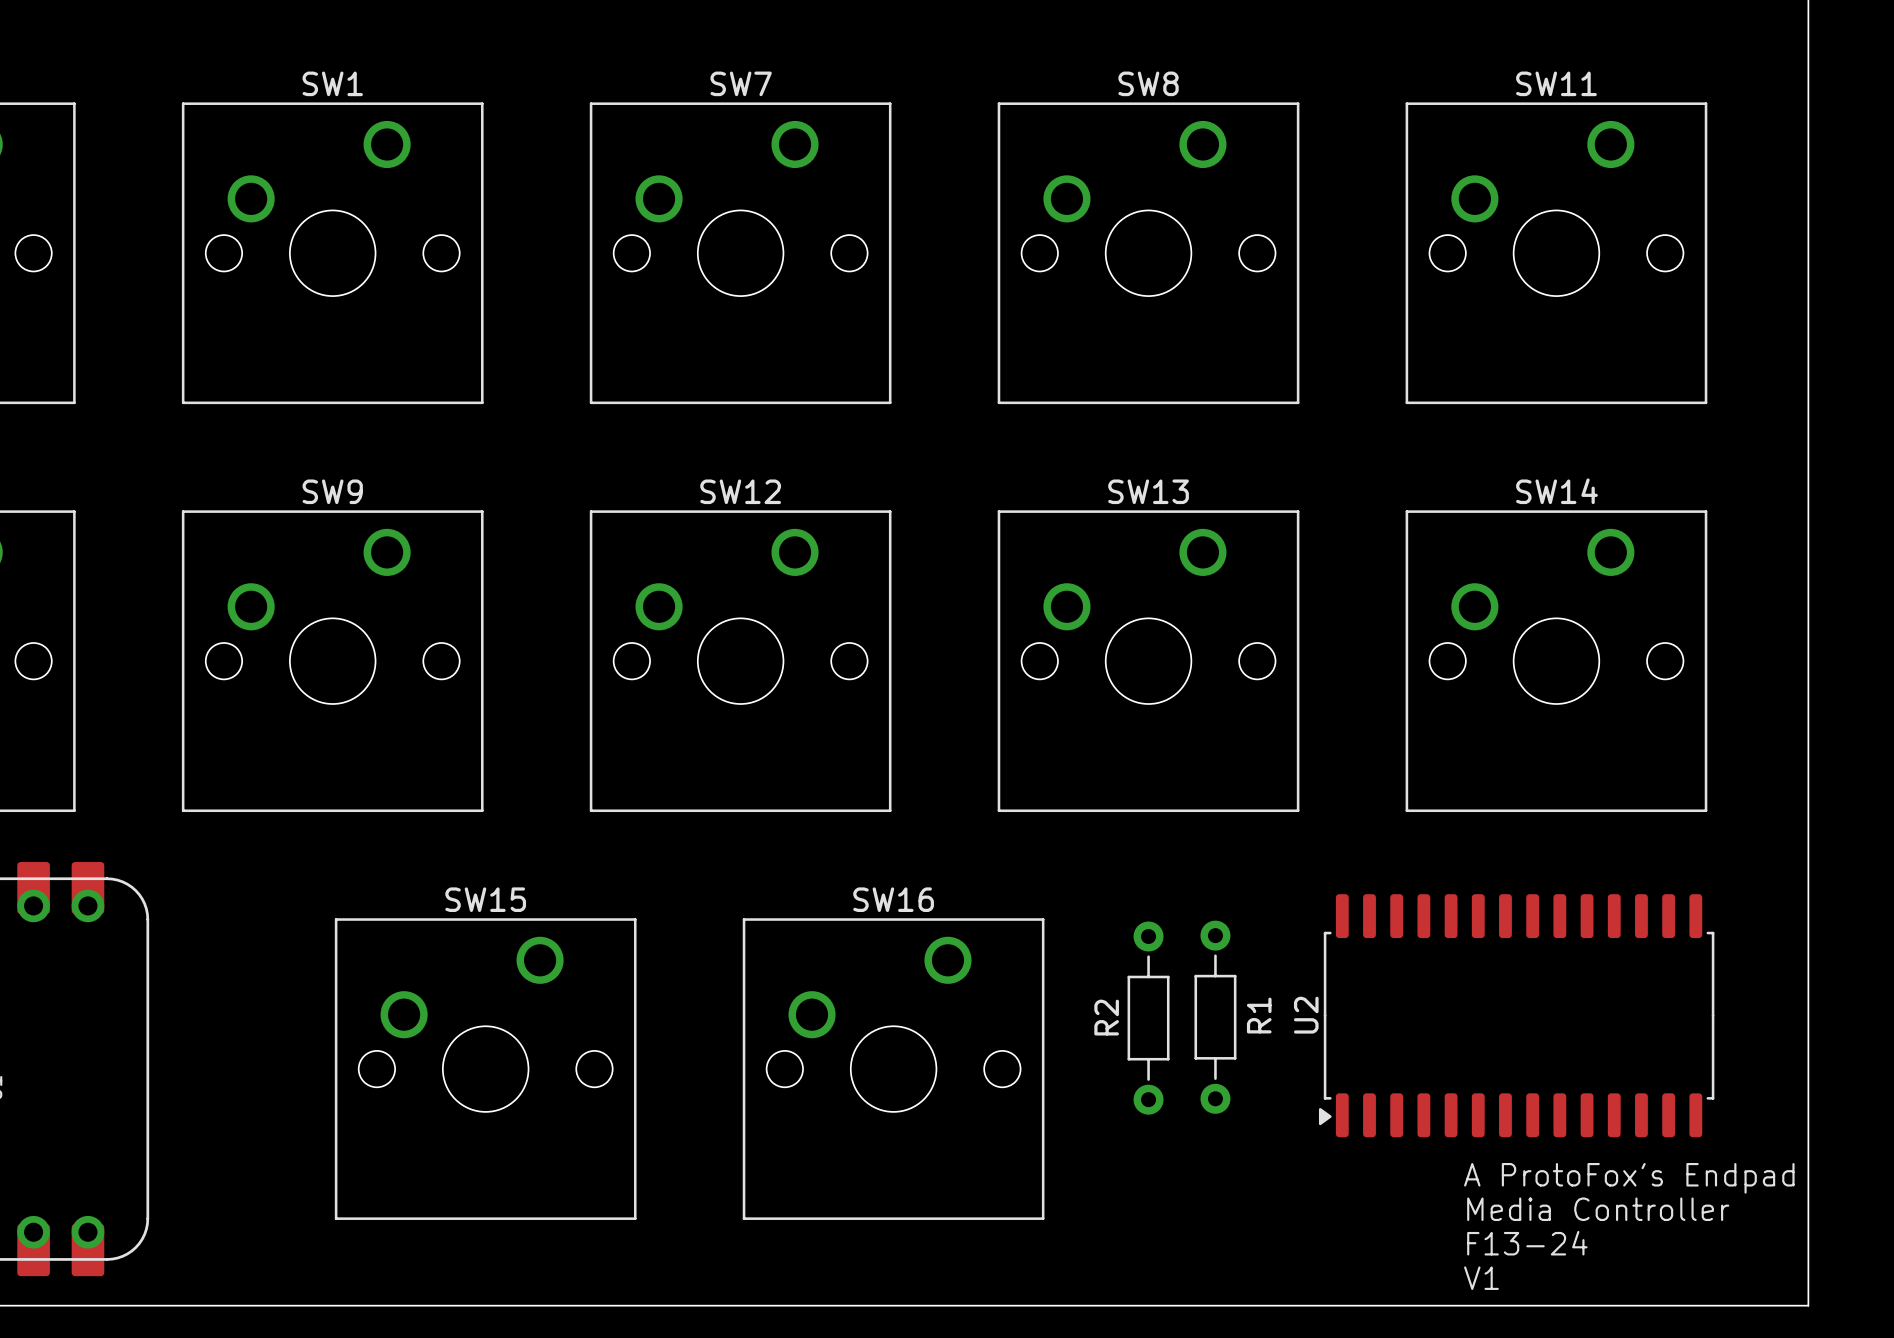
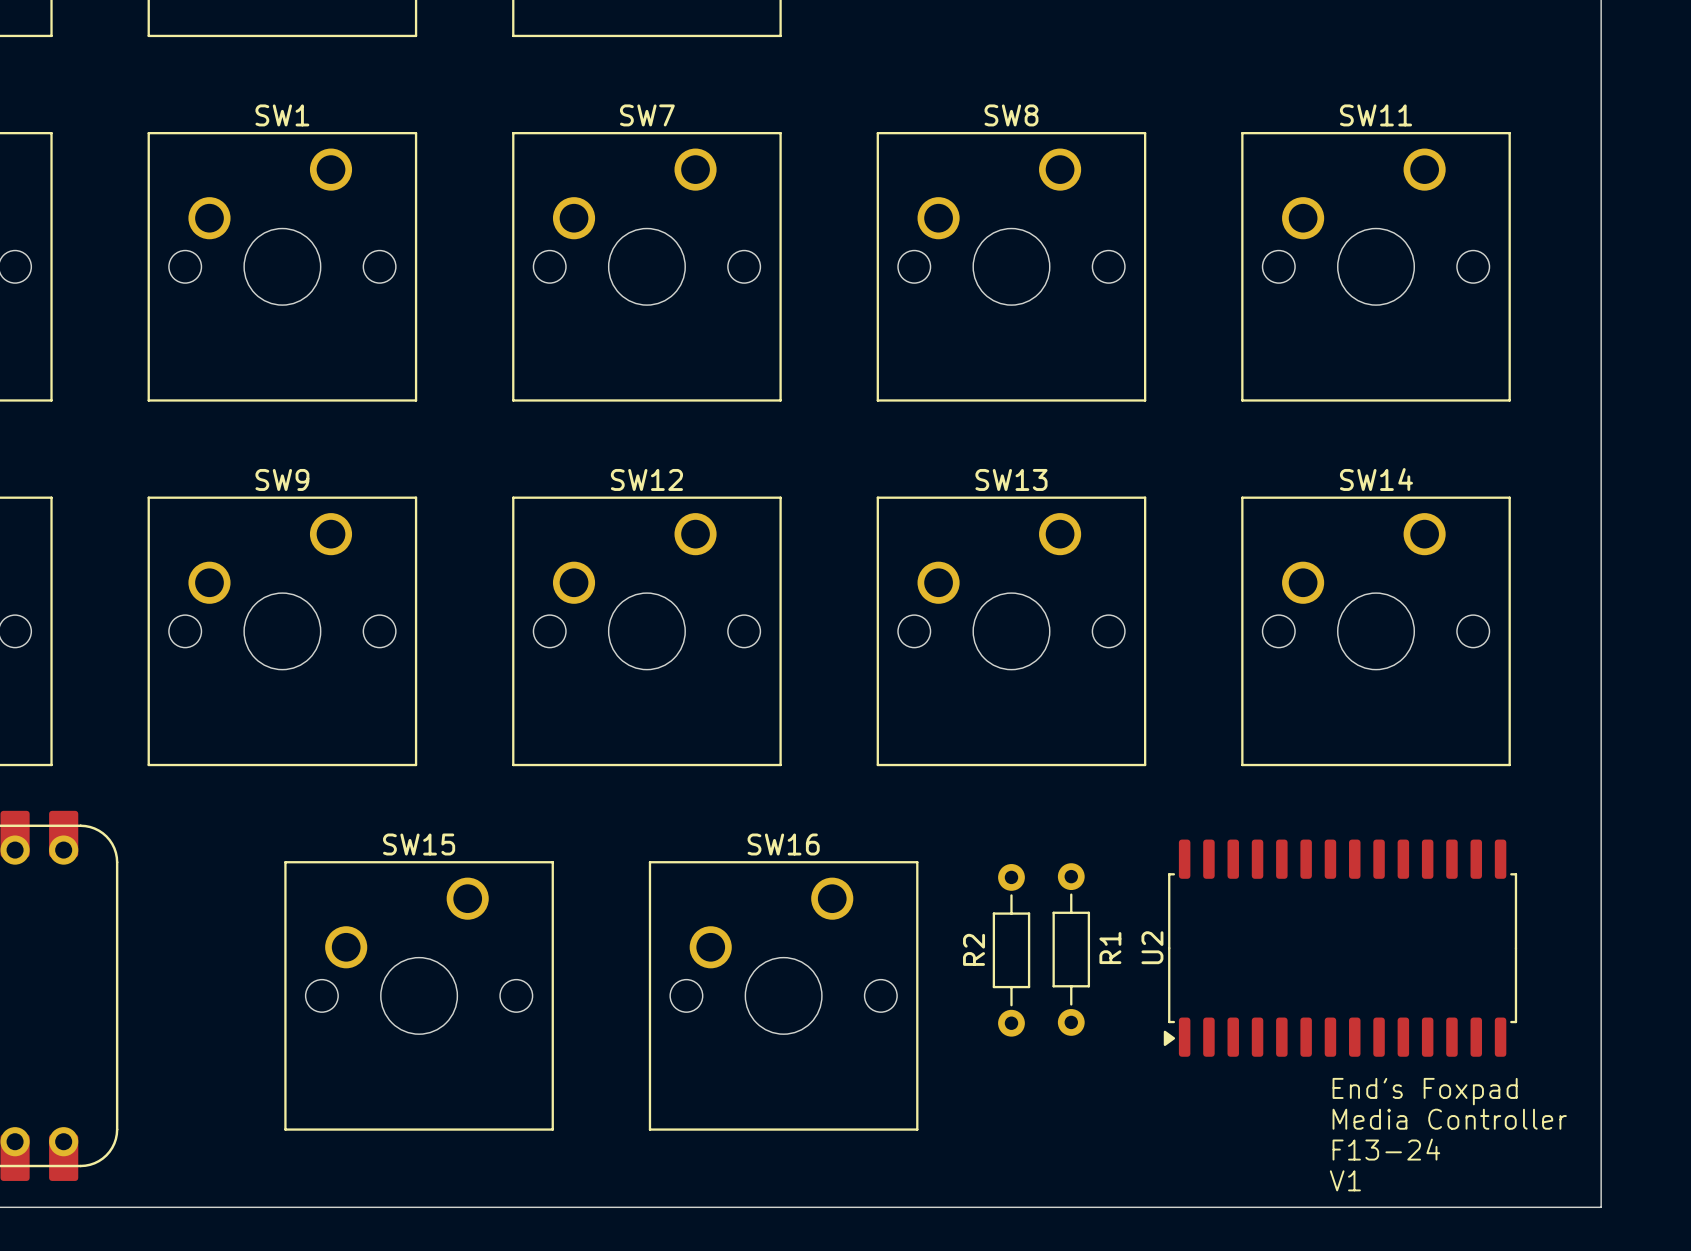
text: none -> End's Foxpad (1425, 1091)
text: A ProtoFox's Endpad (1629, 1178) -> none
text position: Media Controller (1598, 1209) -> Media Controller (1449, 1119)
text position: F13-24 (1527, 1243) -> F13-24 (1386, 1149)
text position: V1 (1481, 1278) -> V1 (1345, 1180)

